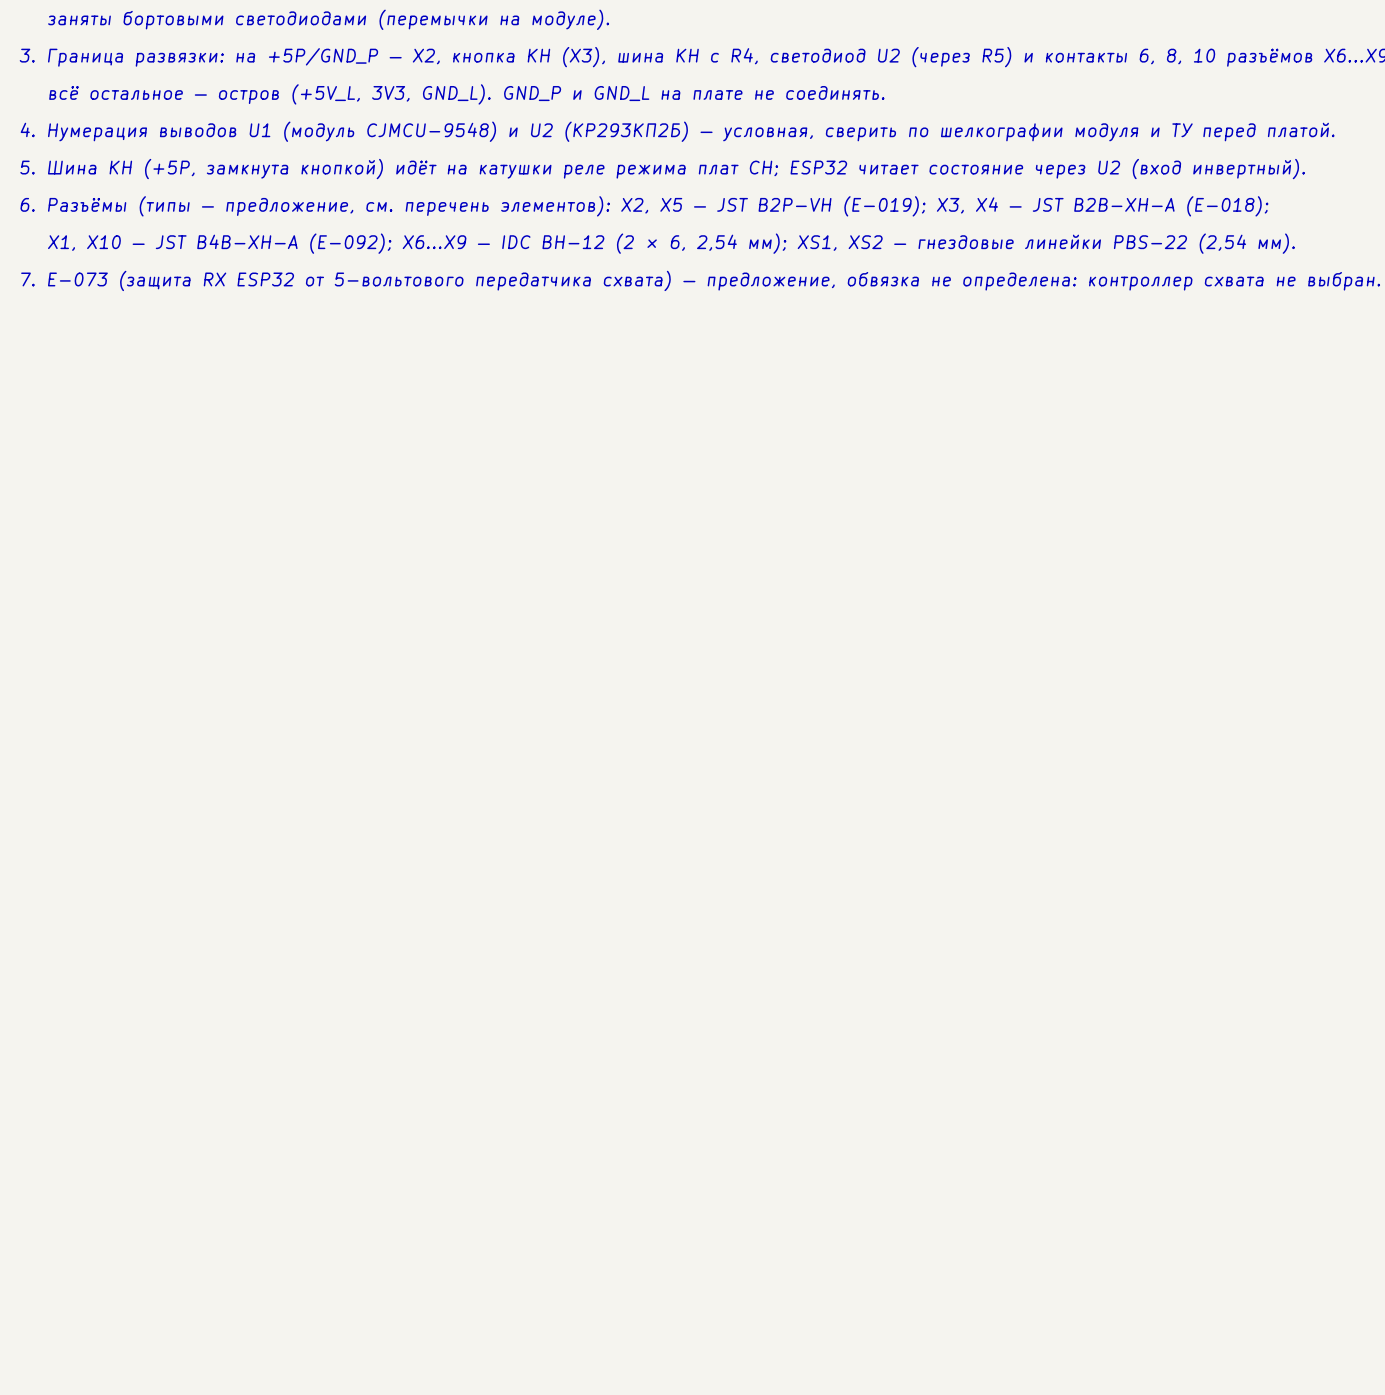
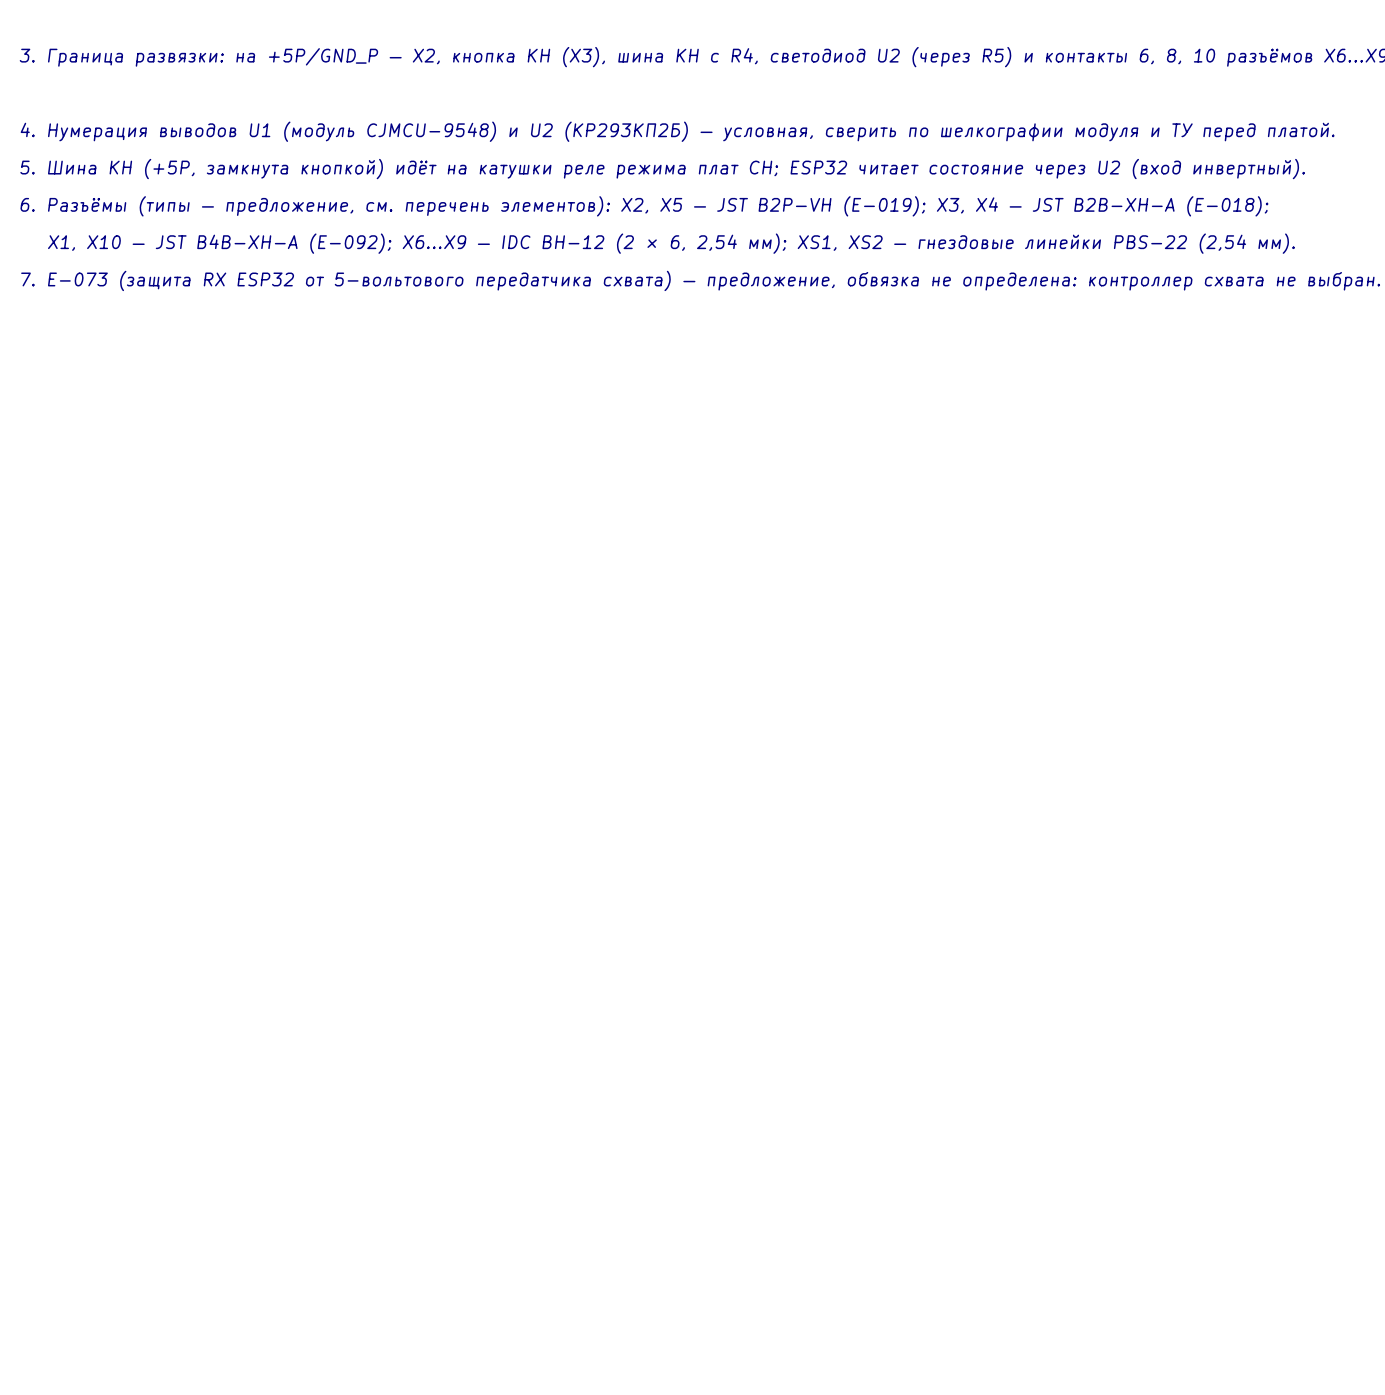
text: заняты бортовыми светодиодами (перемычки на модуле). (328, 19) -> none
text: всё остальное — остров (+5V_L, 3V3, GND_L). GND_P и GND_L на плате не соединять. (466, 94) -> none

